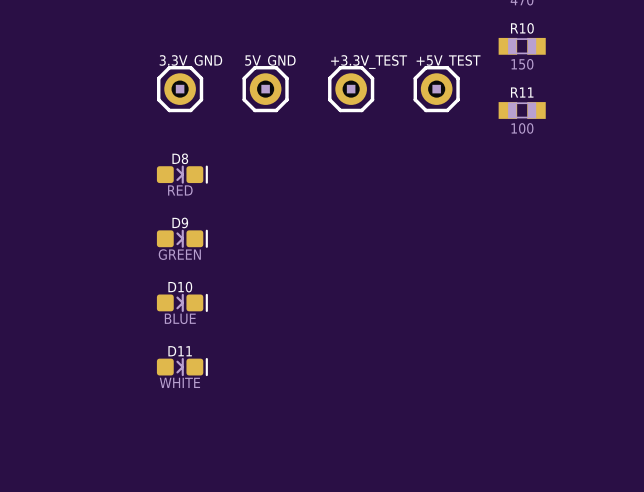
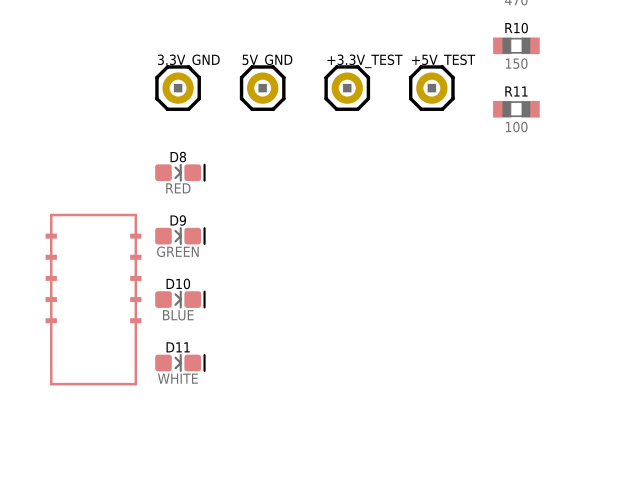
part: none -> (93, 299)

